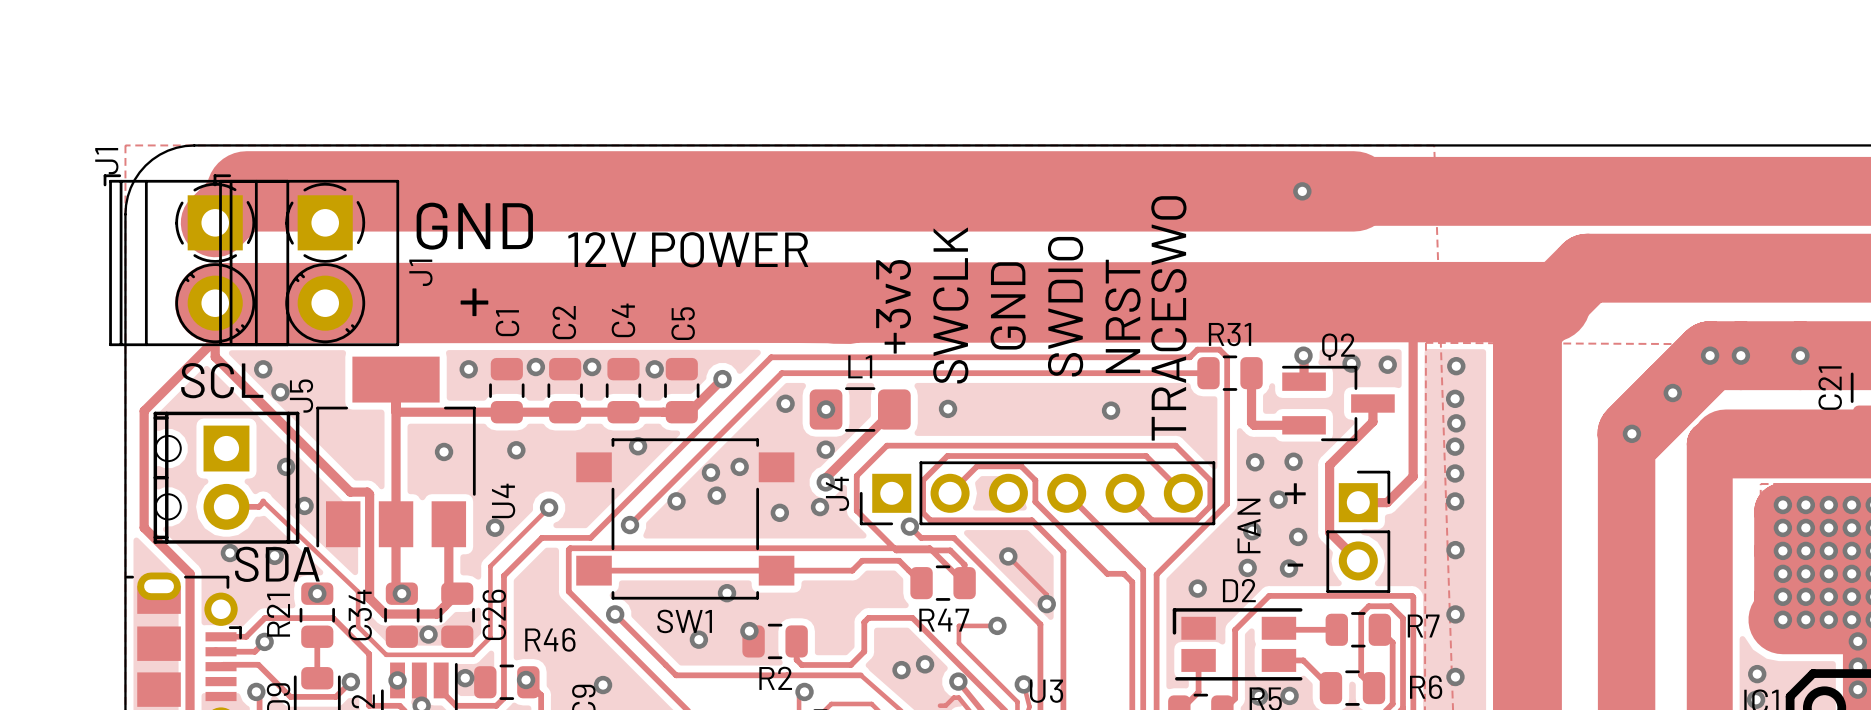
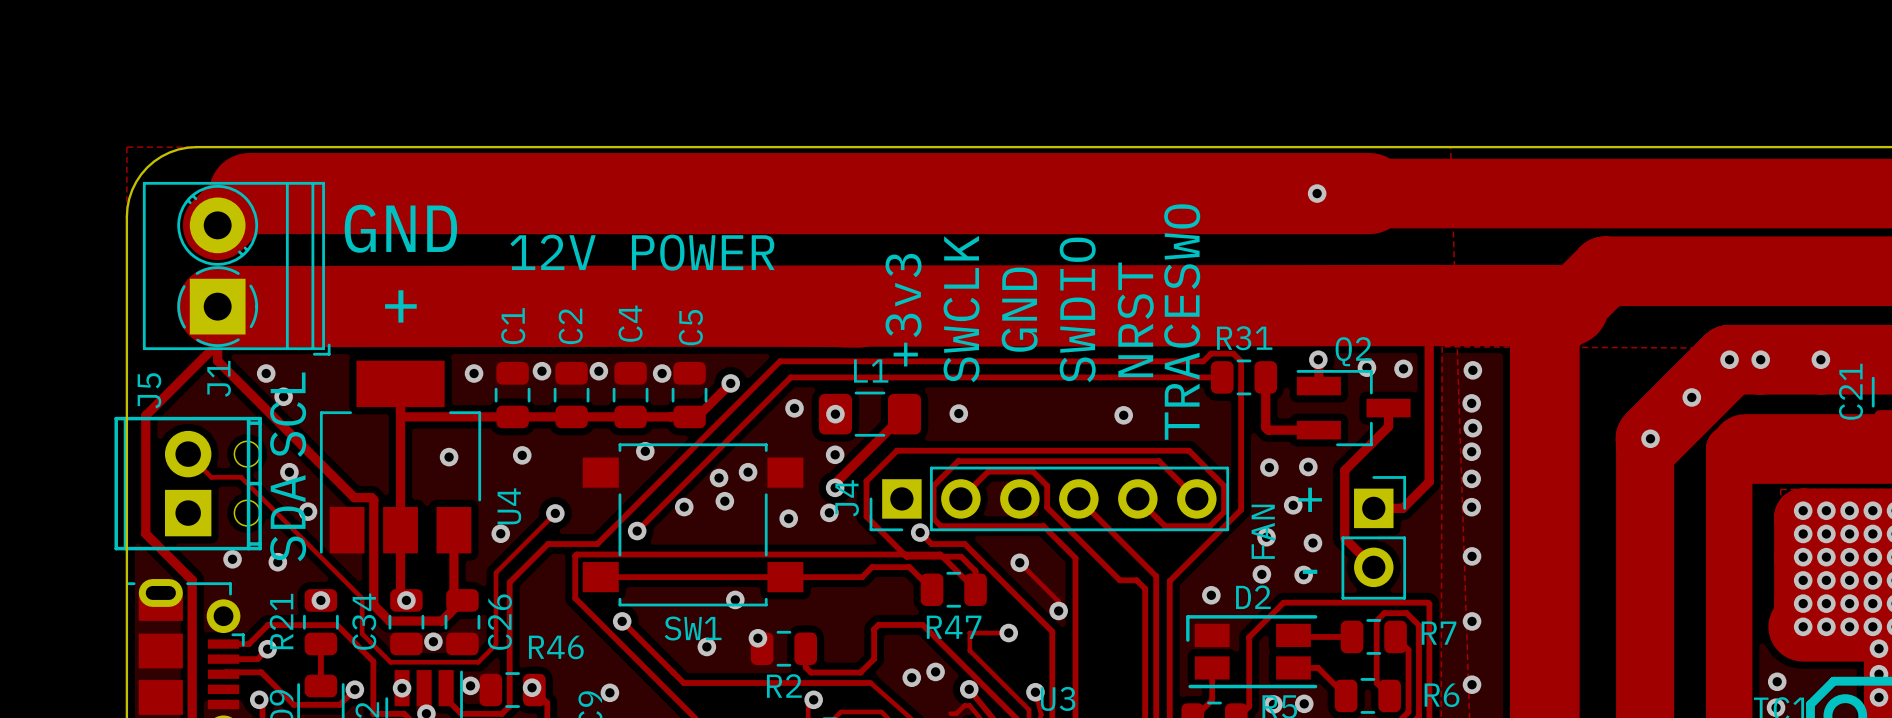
text position: GND (474, 226) -> GND (400, 228)
text position: 12V POWER (688, 249) -> 12V POWER (642, 252)
J1: (196, 260) -> none
J1: (306, 260) -> none
J1: none -> (236, 268)
text position: + (474, 302) -> + (400, 306)
text rotation: 0° (222, 380) -> 90° counterclockwise (288, 414)
J5 name position: J5 (301, 396) -> J5 (149, 390)
J5 rotation: 0° (226, 477) -> 180° (188, 483)
track: (226, 506) (258, 506) (263, 501) (358, 591) -> (188, 454) (211, 477) (241, 477) (362, 598)
text rotation: 0° (277, 564) -> 90° counterclockwise (288, 518)

